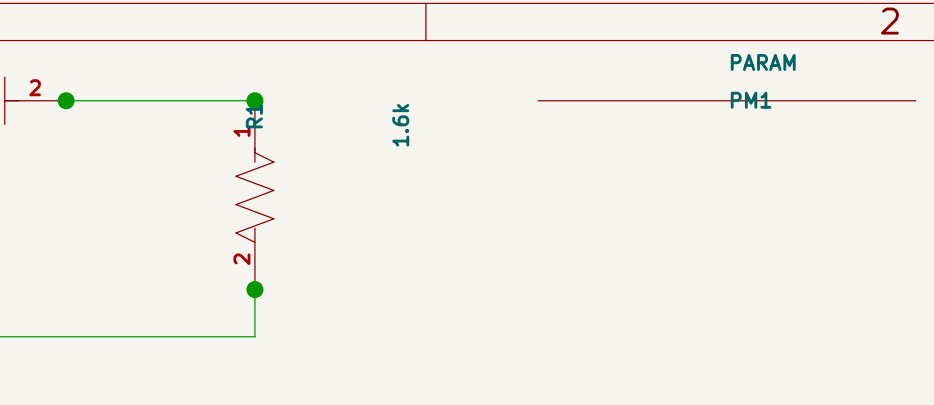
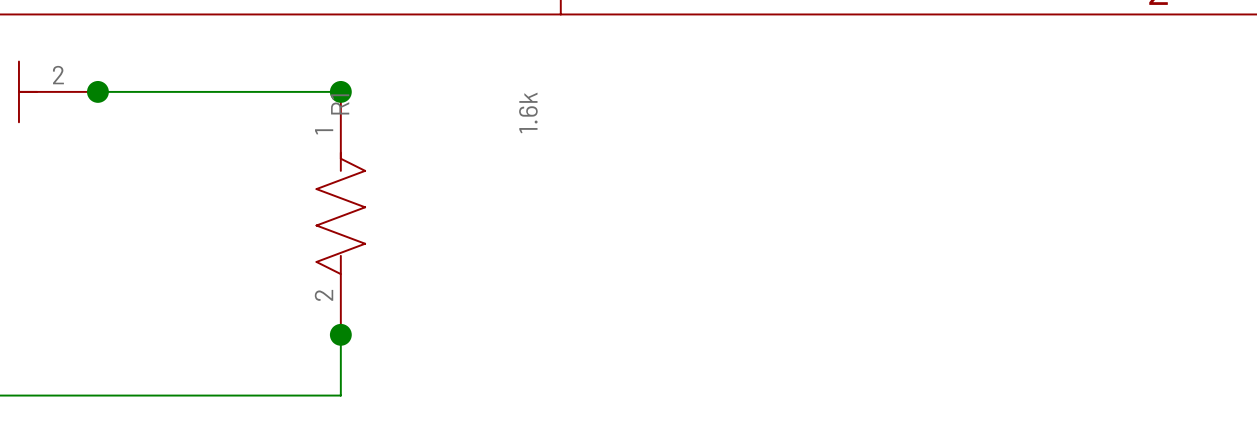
PM1: PARAM (726, 100) -> none

